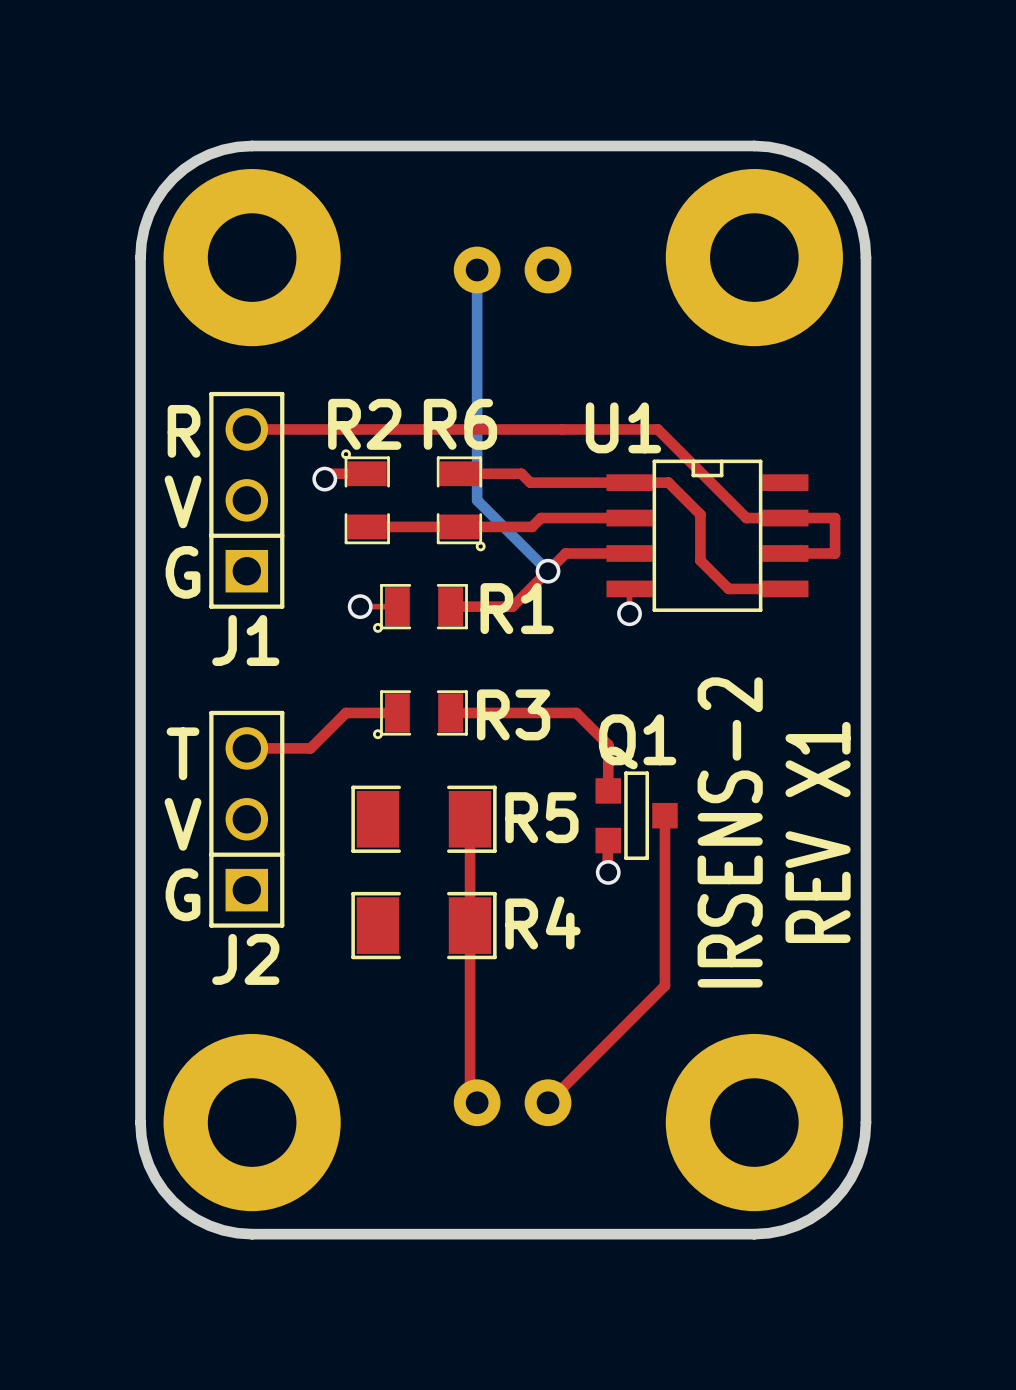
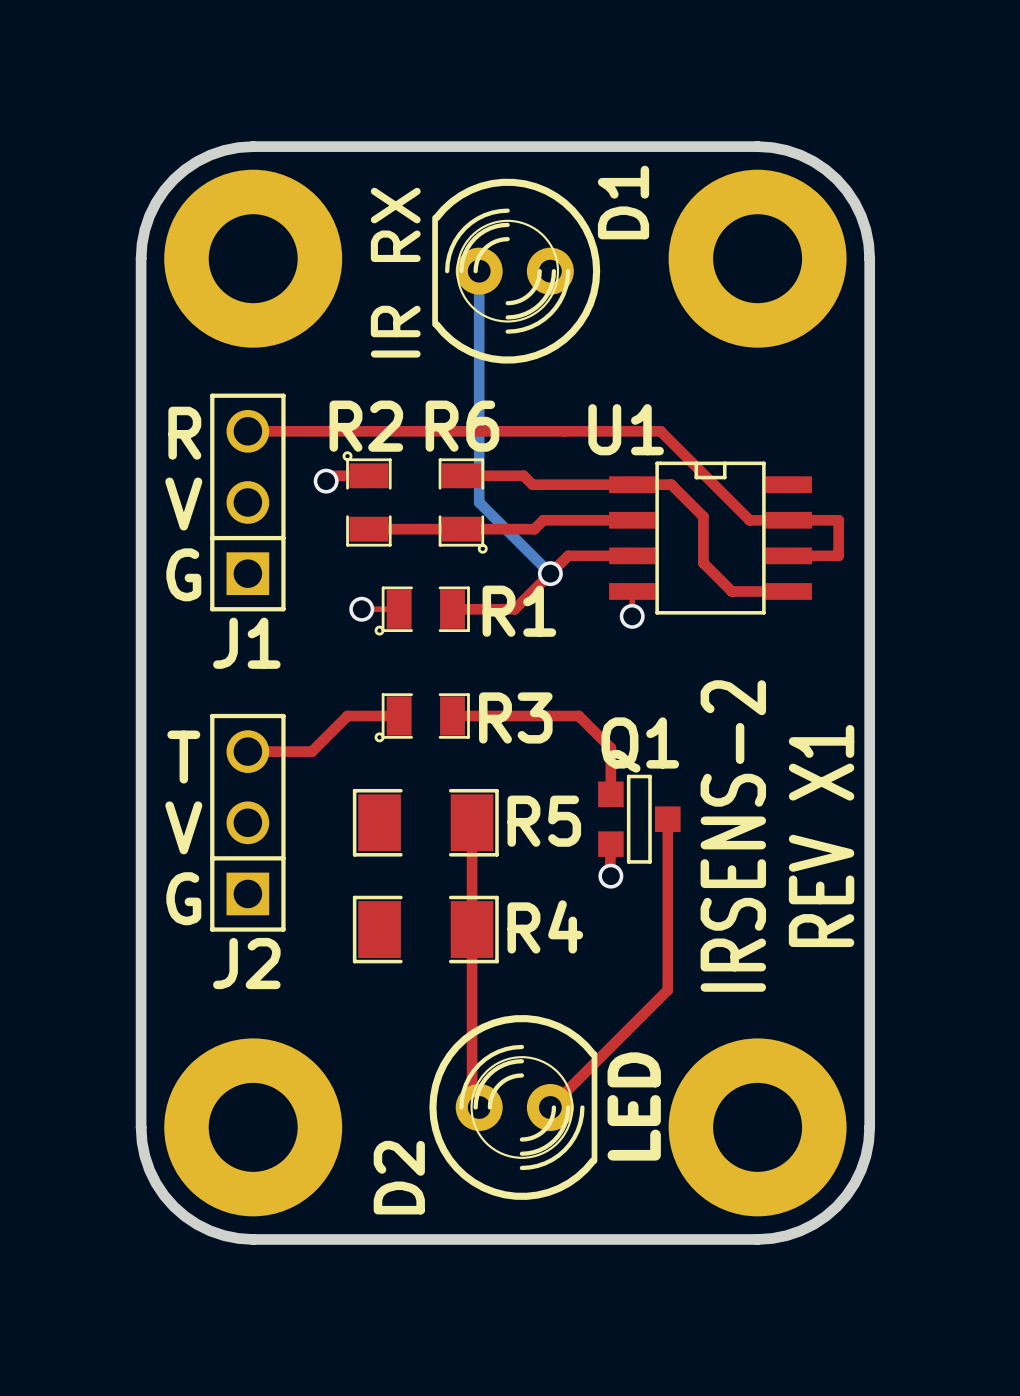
D1 side: bottom (512, 270) -> top (516, 271)
D2 side: bottom (512, 1102) -> top (513, 1107)

